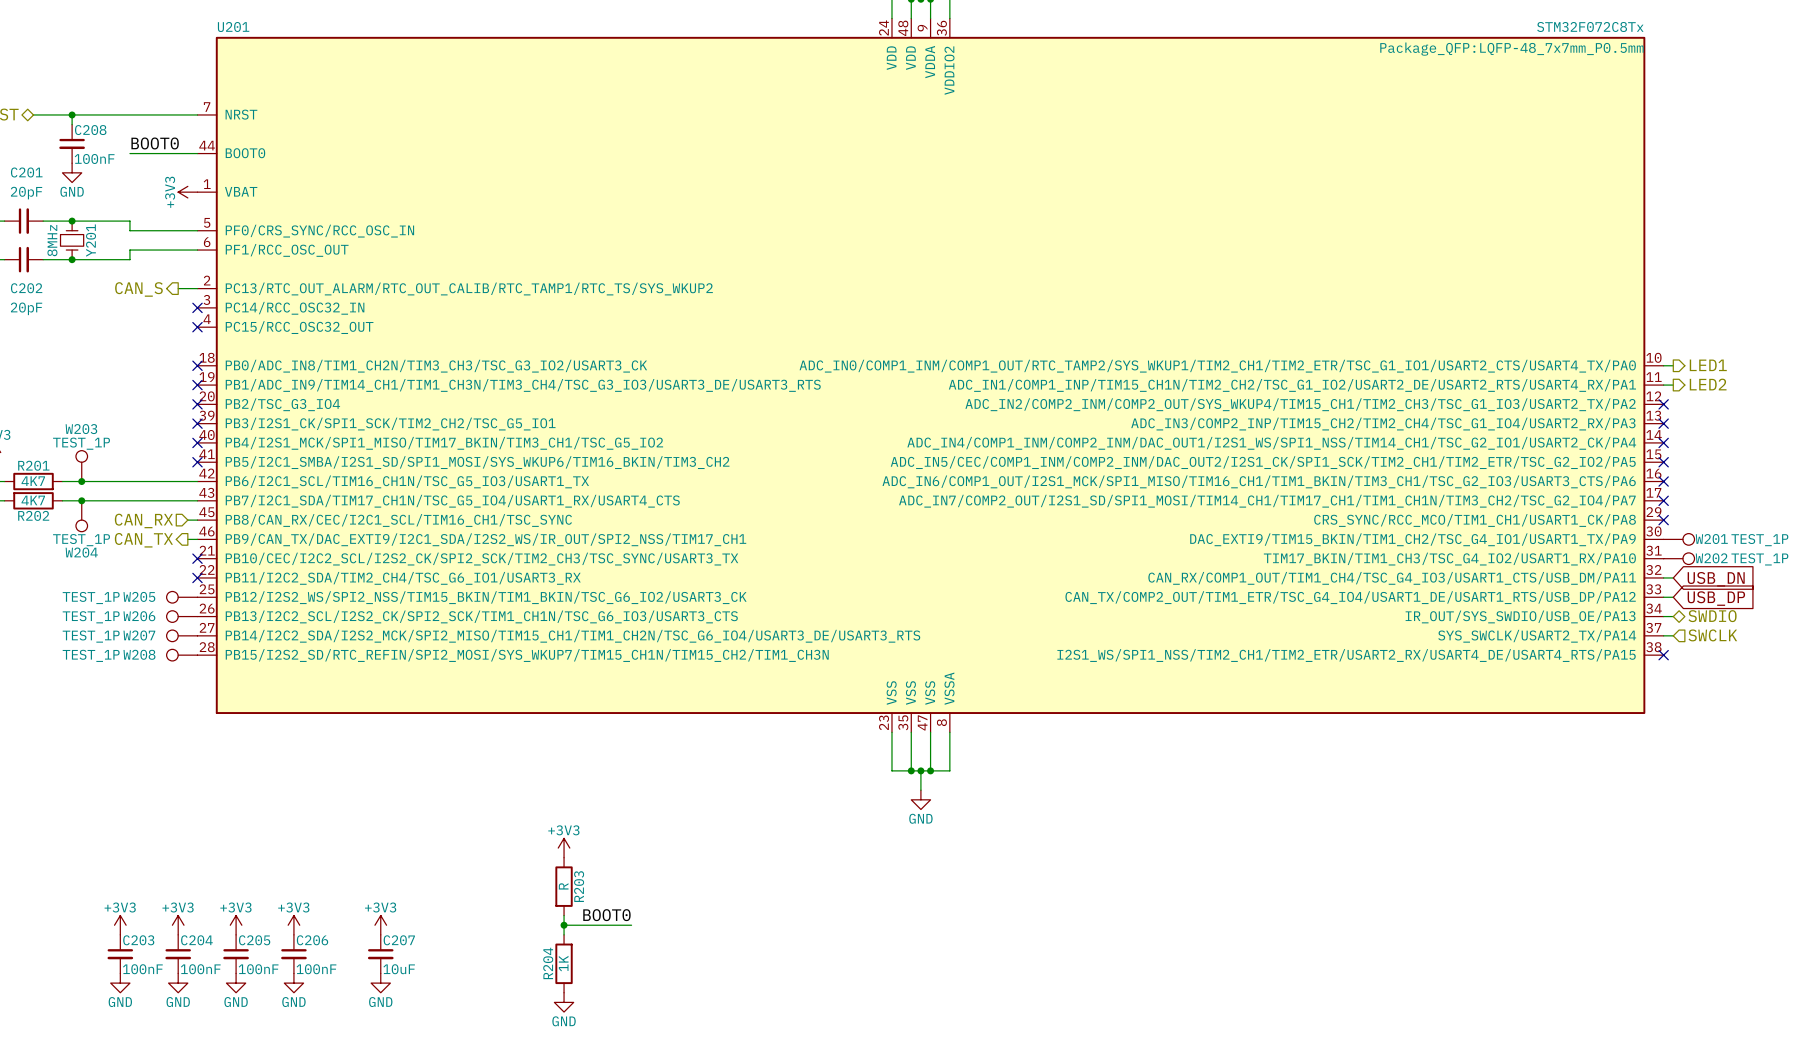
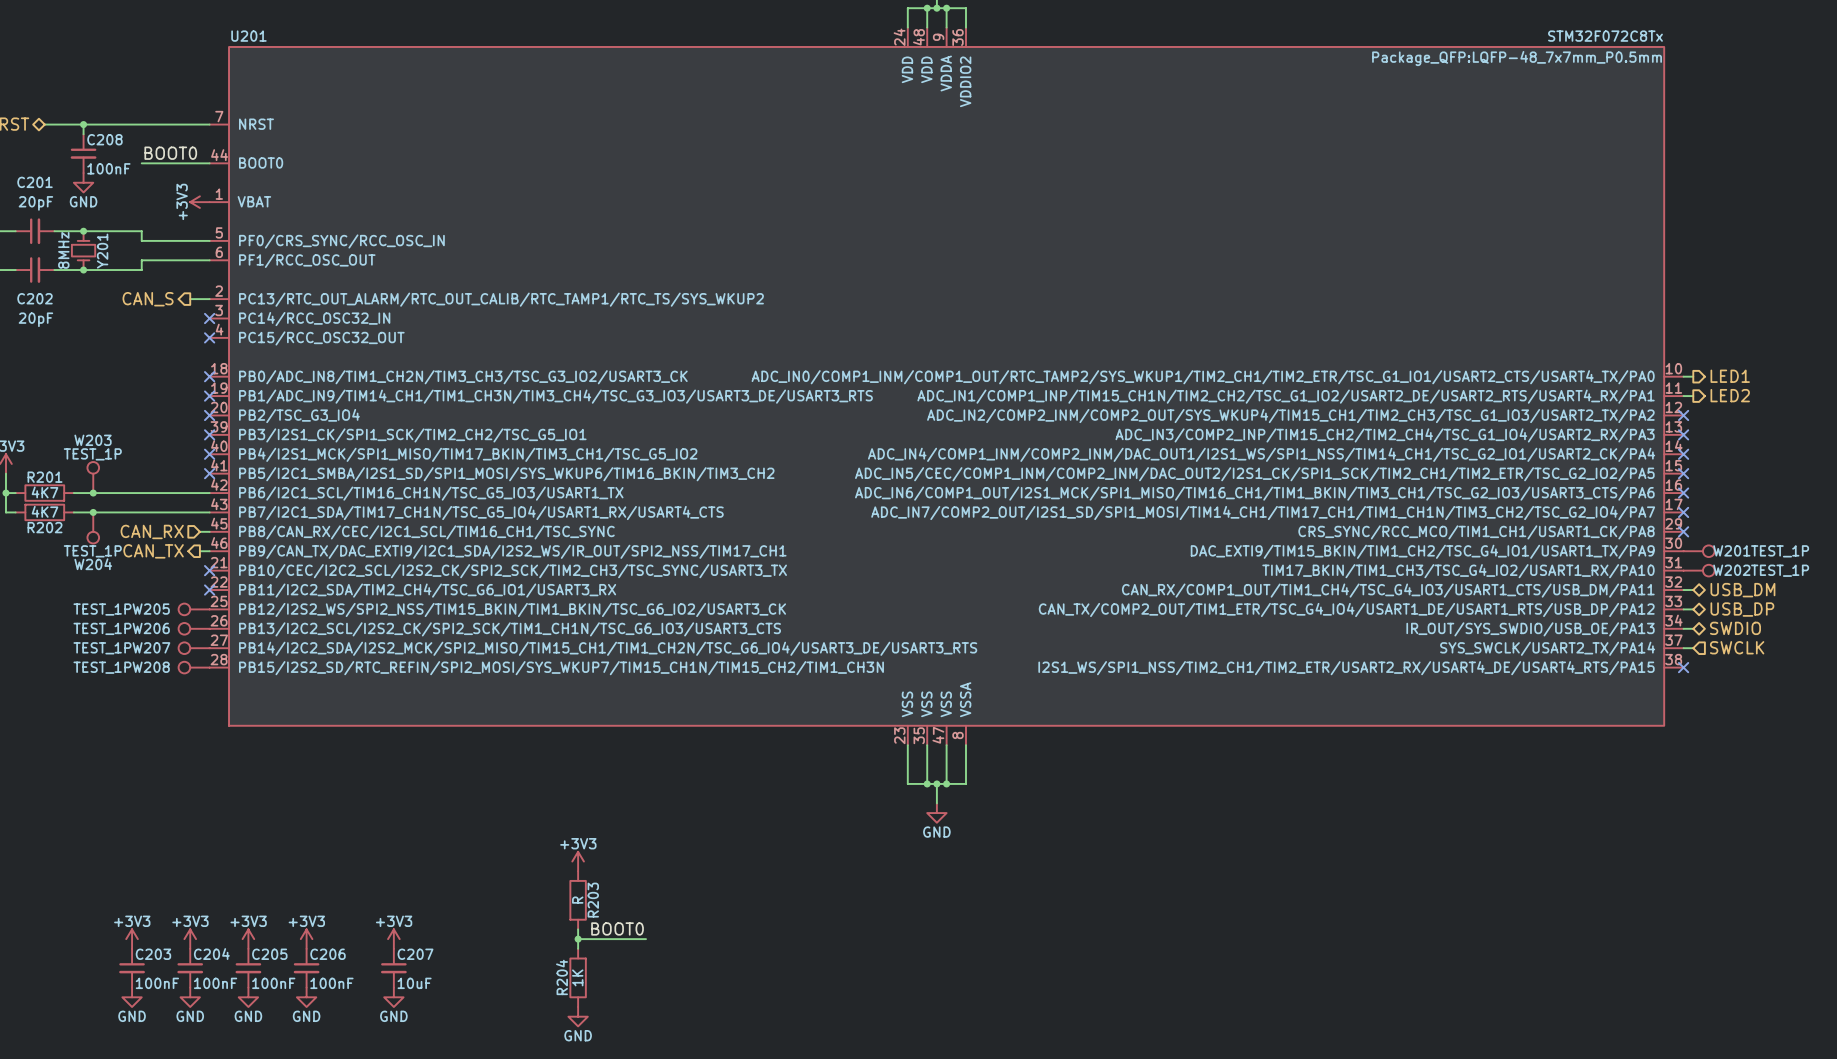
hierarchical label: none -> USB_DM (1742, 590)
global label: USB_DN (1716, 579) -> none
global label: USB_DP (1716, 598) -> none
hierarchical label: none -> USB_DP (1742, 609)

